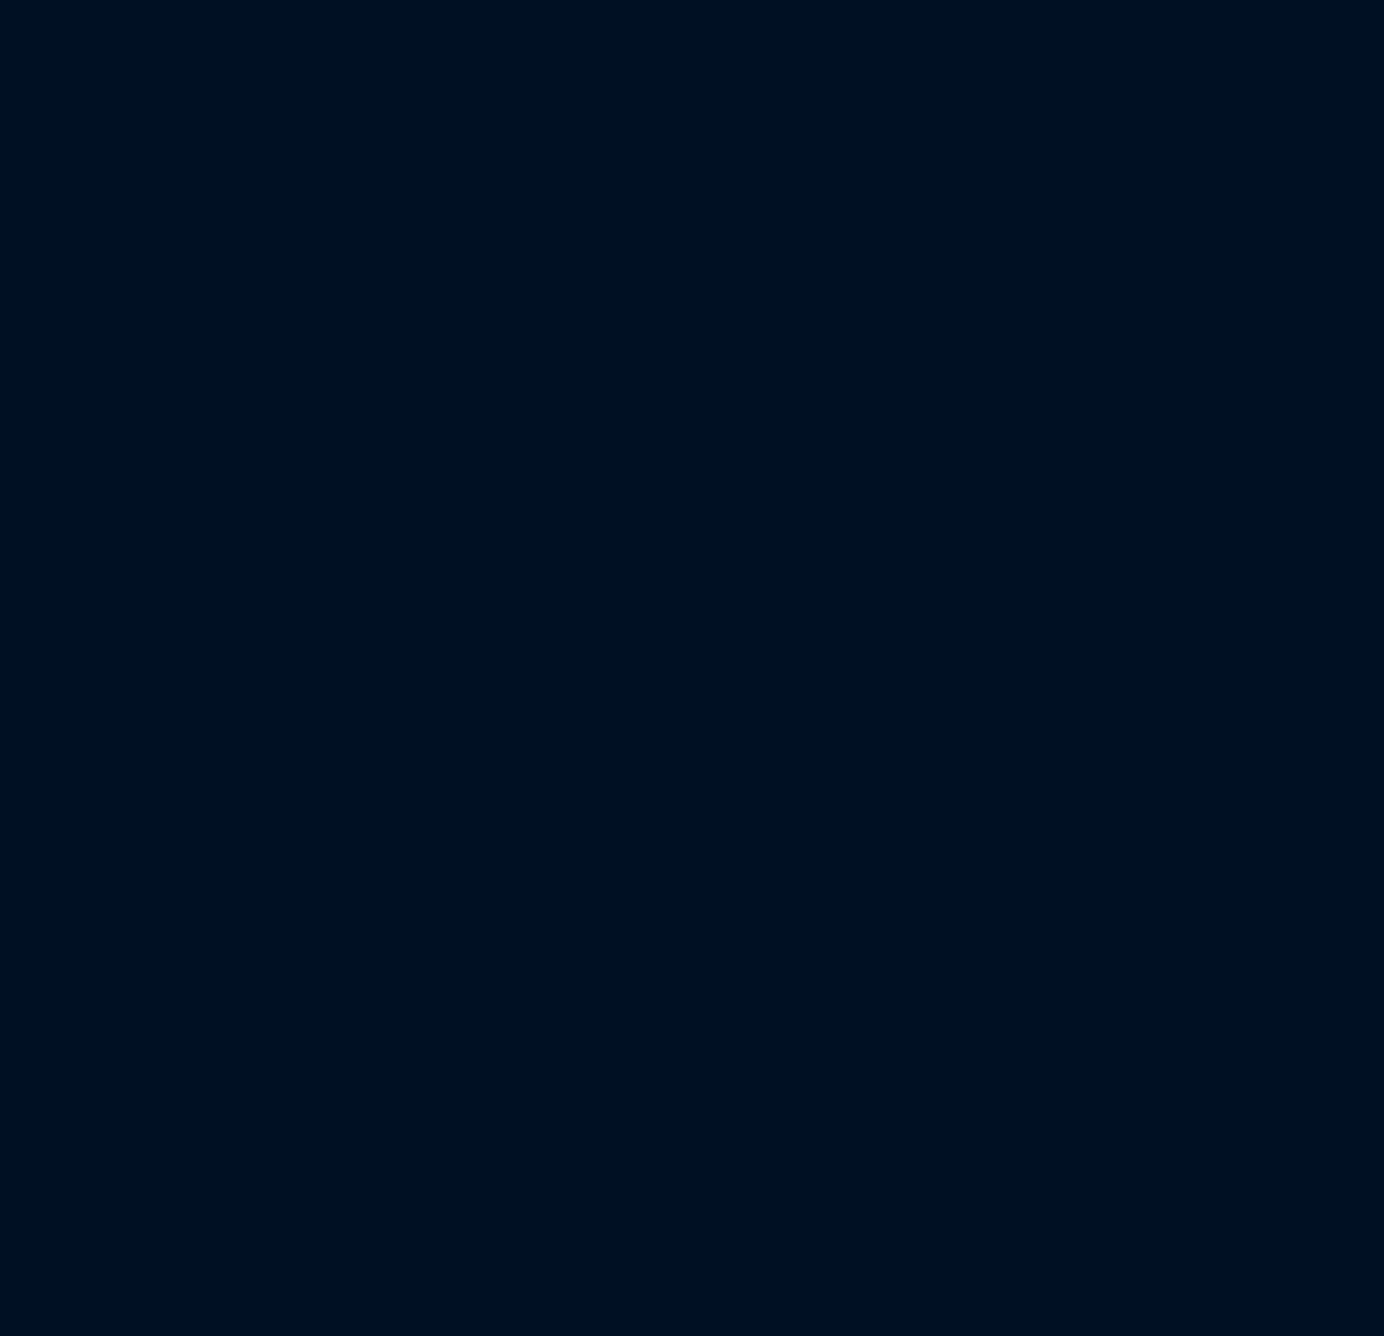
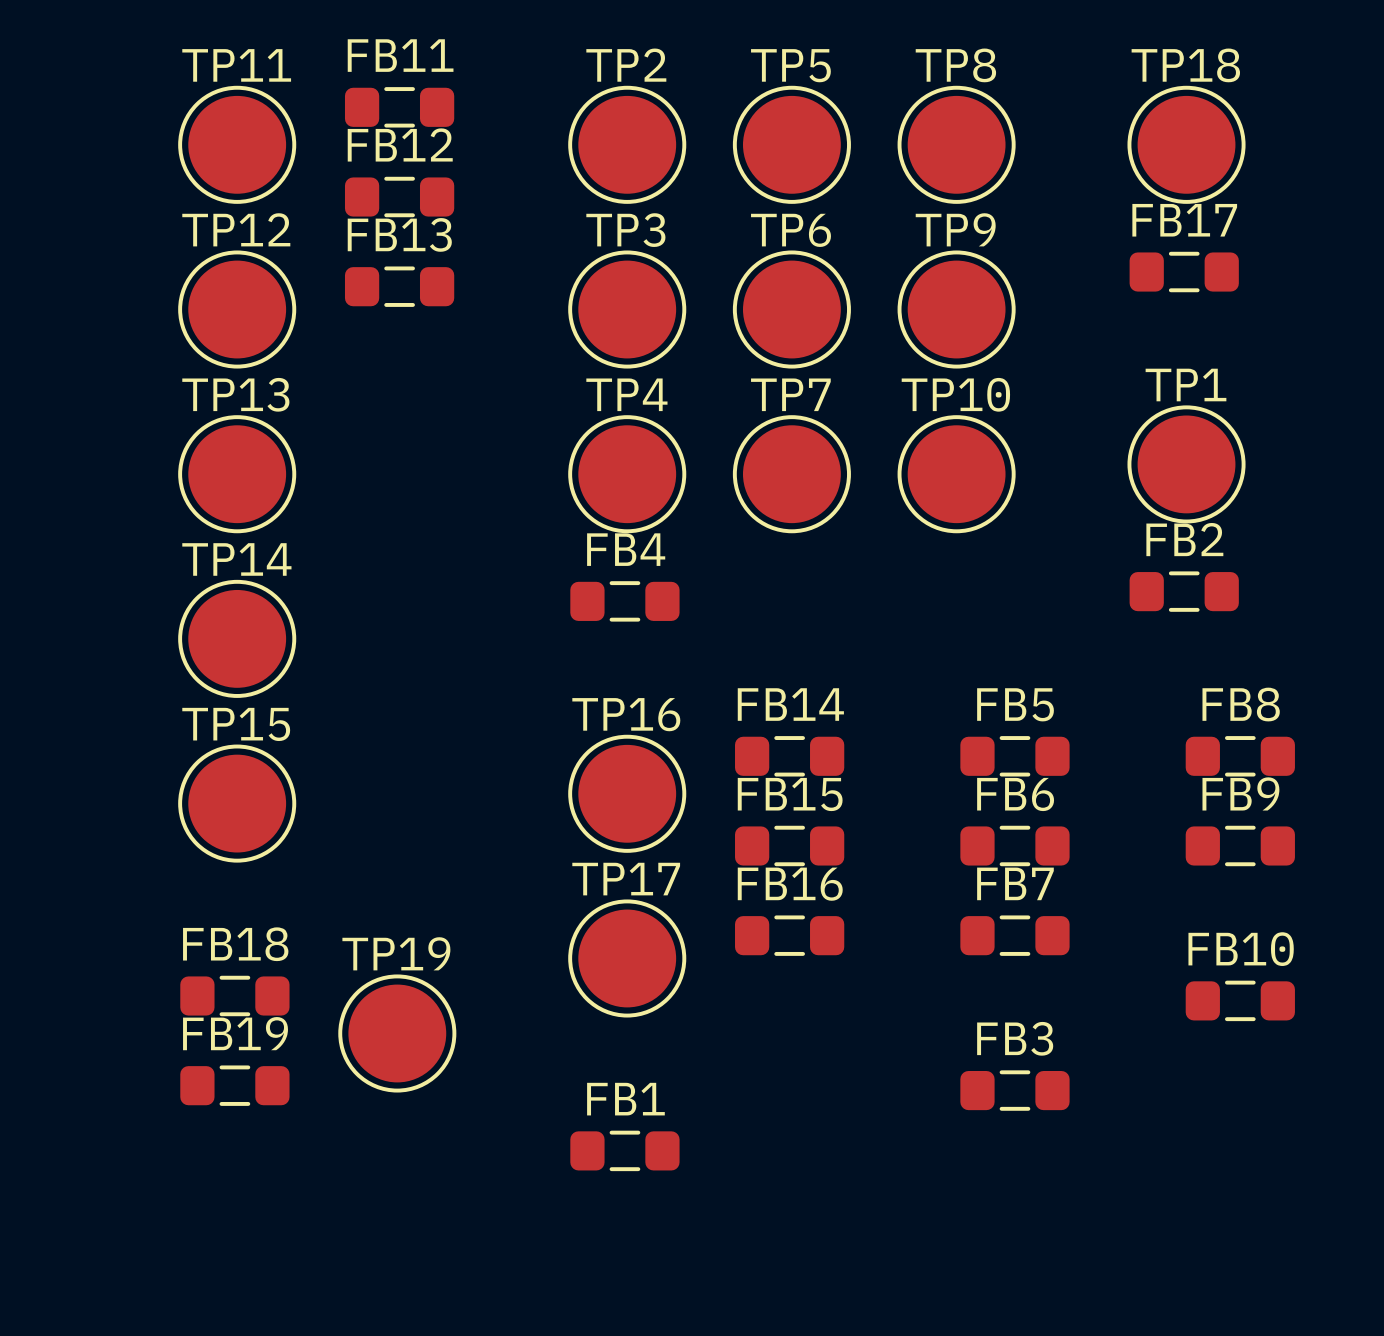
FB11: none -> (399, 107)
TP11: none -> (237, 144)
TP2: none -> (627, 144)
TP5: none -> (791, 144)
TP8: none -> (956, 144)
TP18: none -> (1186, 144)
FB12: none -> (399, 197)
FB17: none -> (1184, 272)
FB13: none -> (399, 286)
TP12: none -> (237, 309)
TP3: none -> (627, 309)
TP6: none -> (791, 309)
TP9: none -> (956, 309)
TP1: none -> (1186, 464)
TP13: none -> (237, 474)
TP4: none -> (627, 474)
TP7: none -> (791, 474)
TP10: none -> (956, 474)
FB2: none -> (1184, 591)
FB4: none -> (624, 601)
TP14: none -> (237, 638)
FB14: none -> (789, 756)
FB5: none -> (1014, 756)
FB8: none -> (1240, 756)
TP16: none -> (627, 793)
TP15: none -> (237, 803)
FB15: none -> (789, 845)
FB6: none -> (1014, 845)
FB9: none -> (1240, 845)
FB16: none -> (789, 935)
FB7: none -> (1014, 935)
TP17: none -> (627, 958)
FB18: none -> (234, 995)
FB10: none -> (1240, 1000)
TP19: none -> (397, 1033)
FB19: none -> (234, 1085)
FB3: none -> (1014, 1090)
FB1: none -> (624, 1150)

